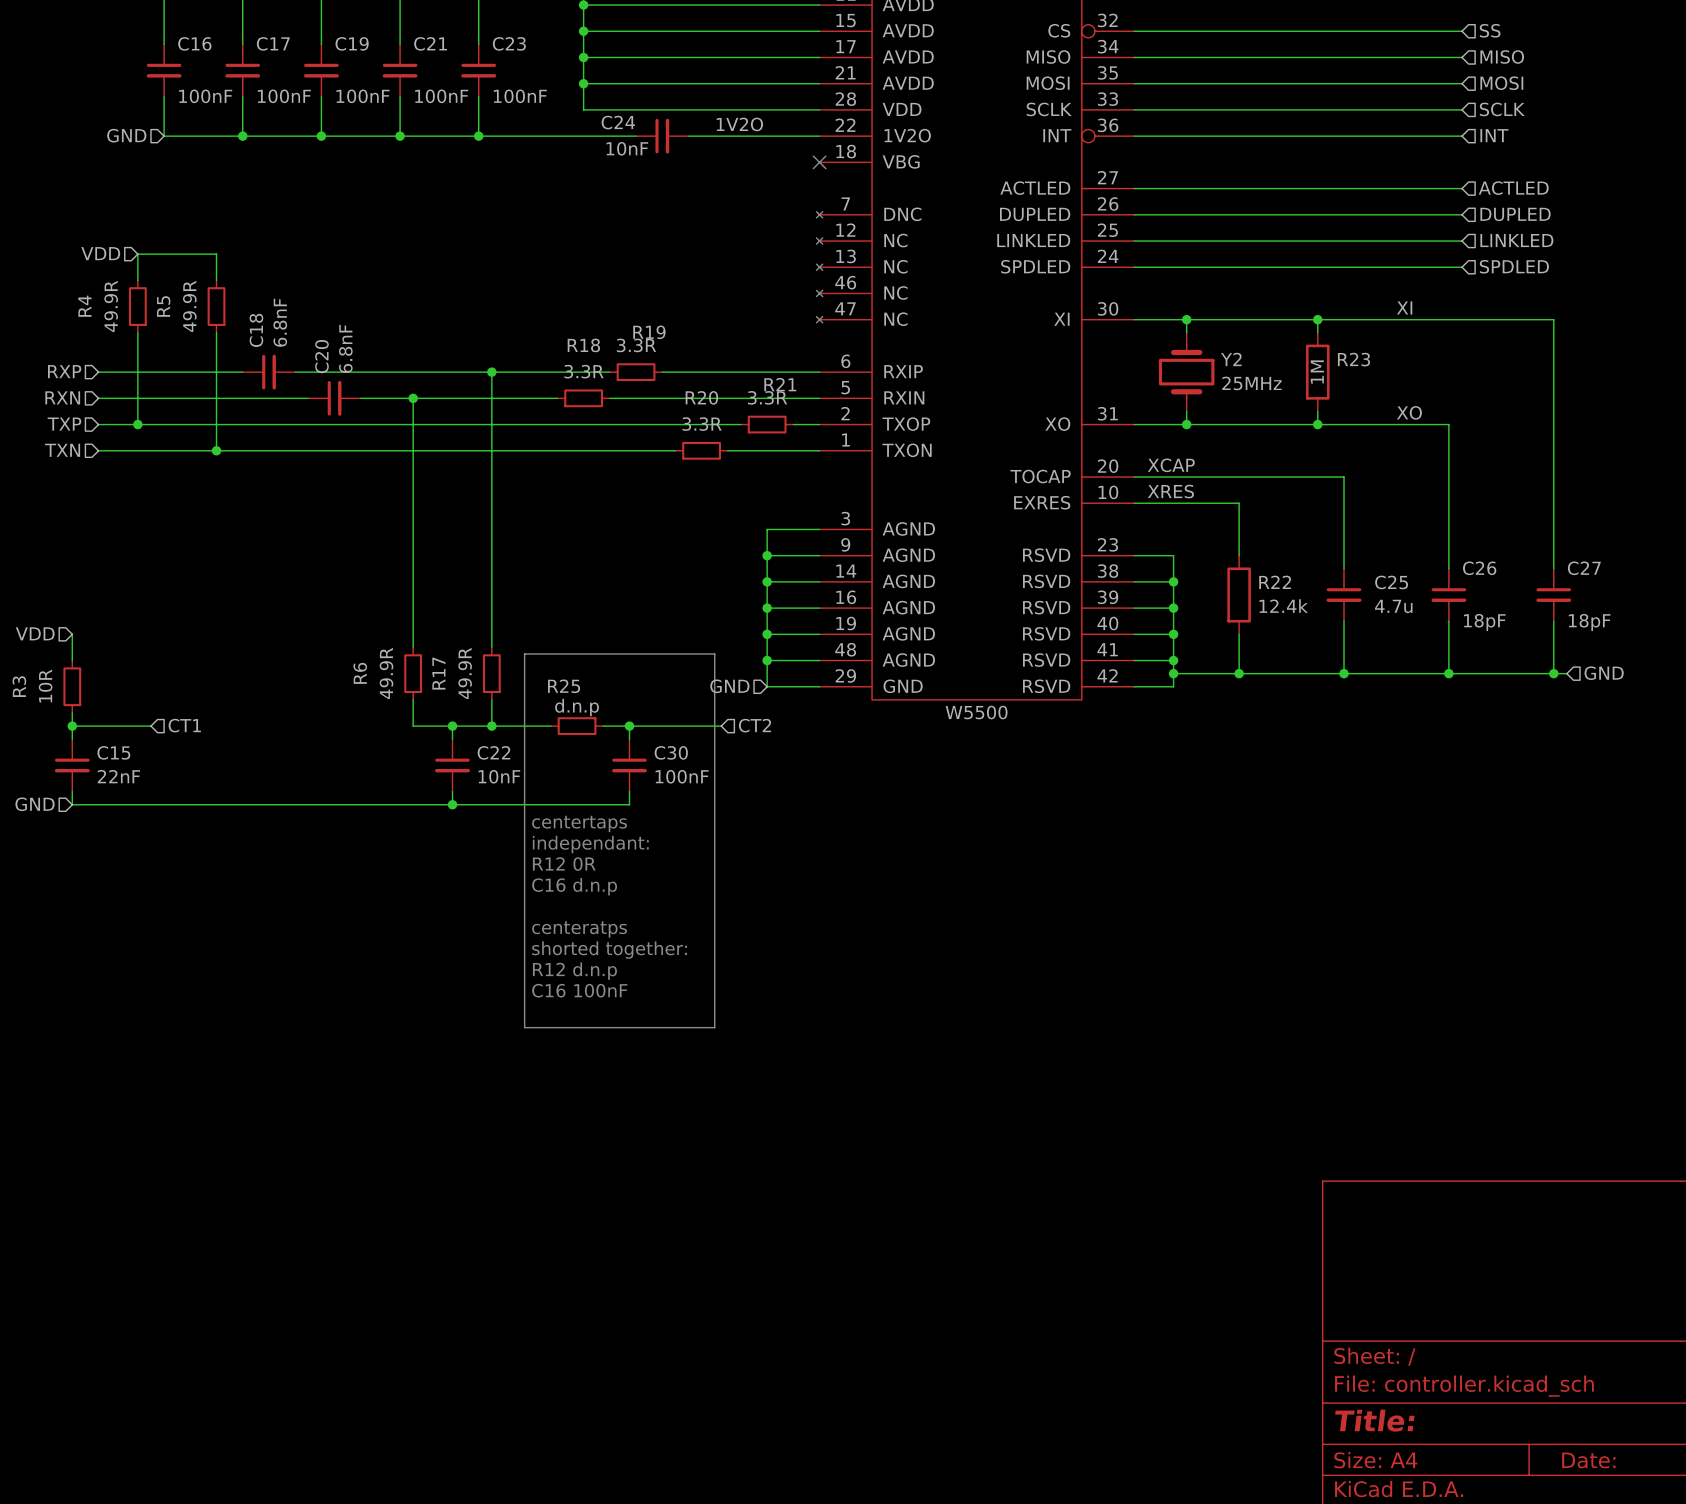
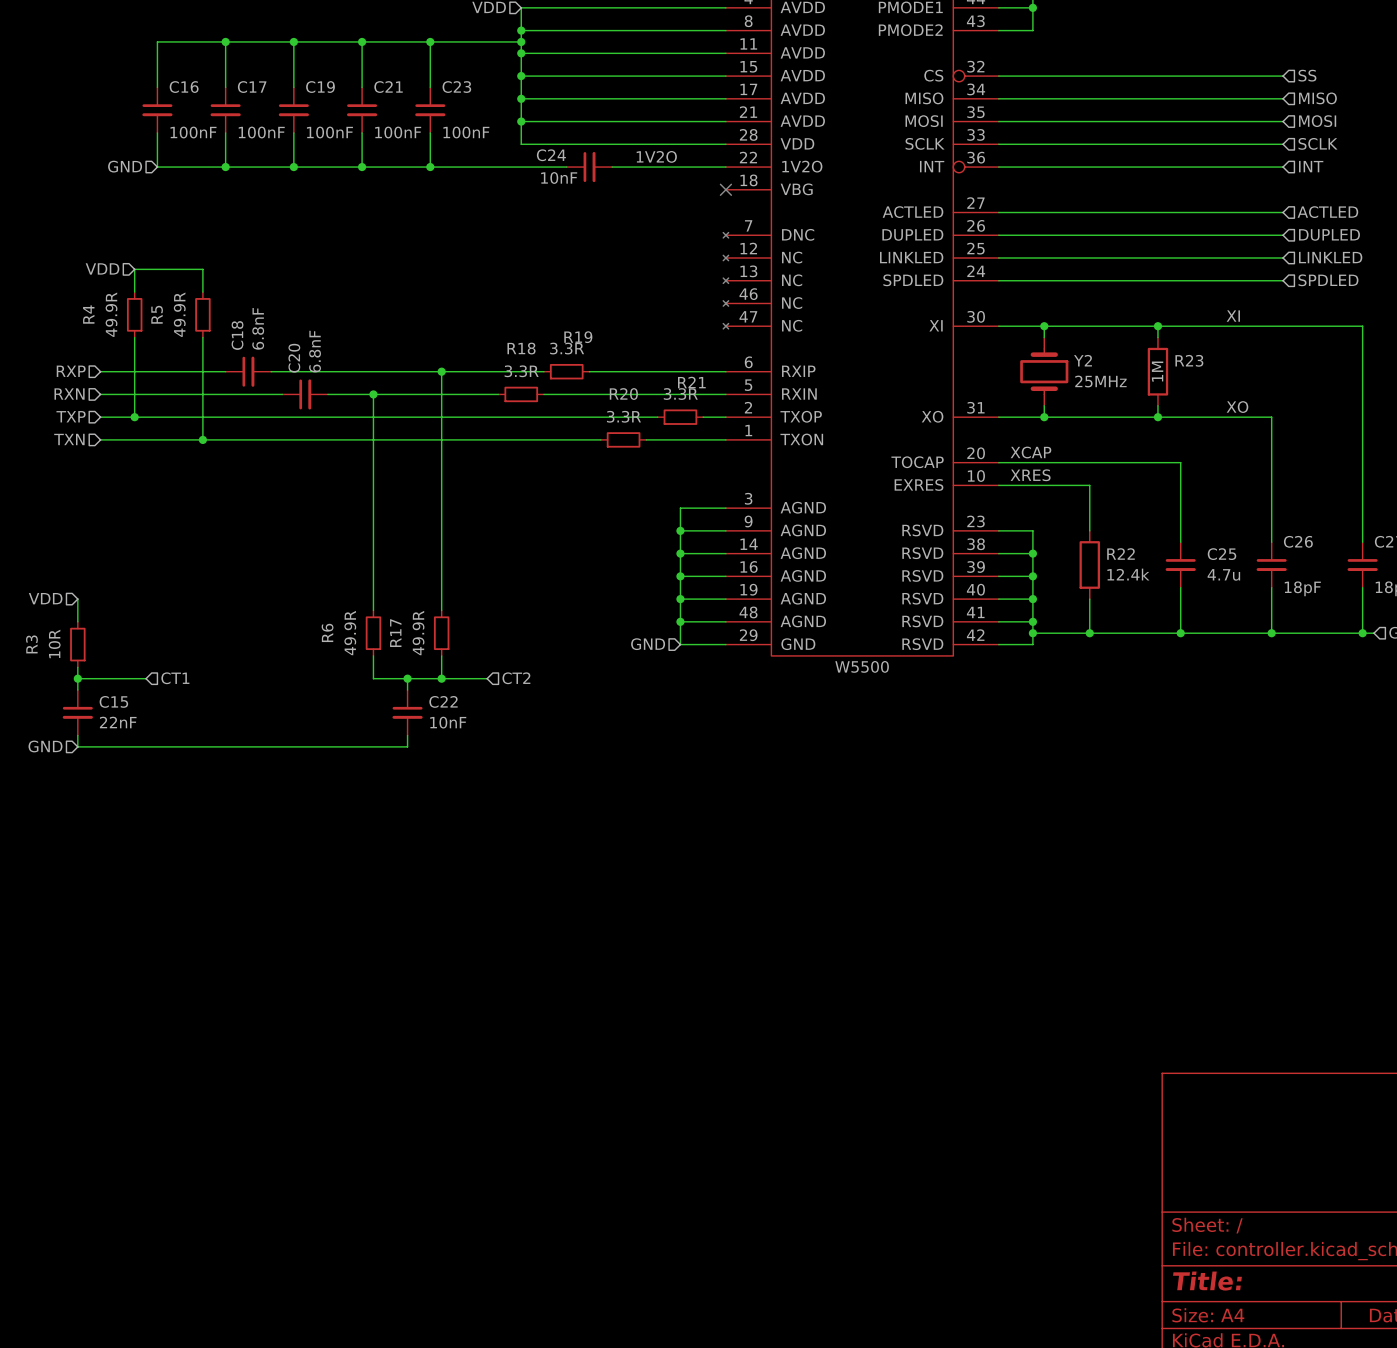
line: (524, 654) (714, 654) (714, 1027) (524, 1027) (524, 654) -> none
hierarchical label position: CT2 (755, 725) -> CT2 (516, 678)
wire: (544, 726) (550, 726) -> none
R25: d.n.p (577, 726) -> none
wire: (603, 726) (721, 726) -> none
wire: (629, 726) (629, 739) -> none
junction: (629, 726) -> none
C30: 100nF (629, 765) -> none
wire: (629, 791) (629, 804) (452, 804) -> none
junction: (452, 804) -> none
text: centertaps (579, 823) -> none
text: independant: (590, 844) -> none
text: R12 0R (564, 864) -> none
text: C16 d.n.p (574, 886) -> none
text: centeratps (579, 929) -> none
text: shorted together: (609, 950) -> none
text: R12 d.n.p (574, 971) -> none
text: C16 100nF (579, 990) -> none

